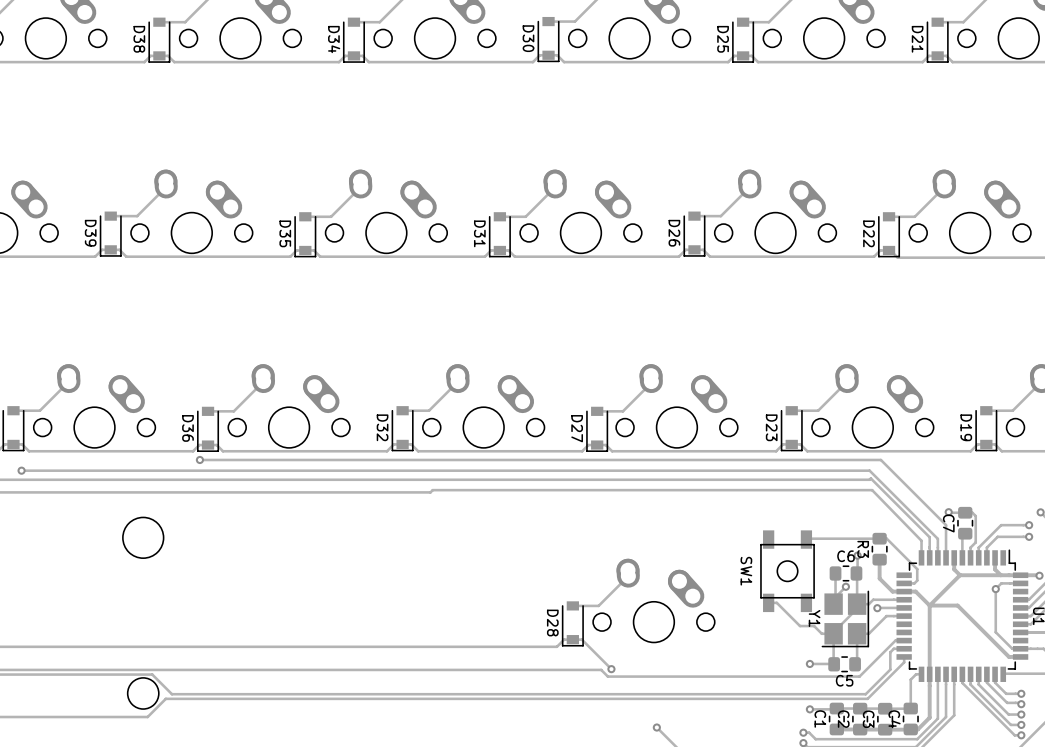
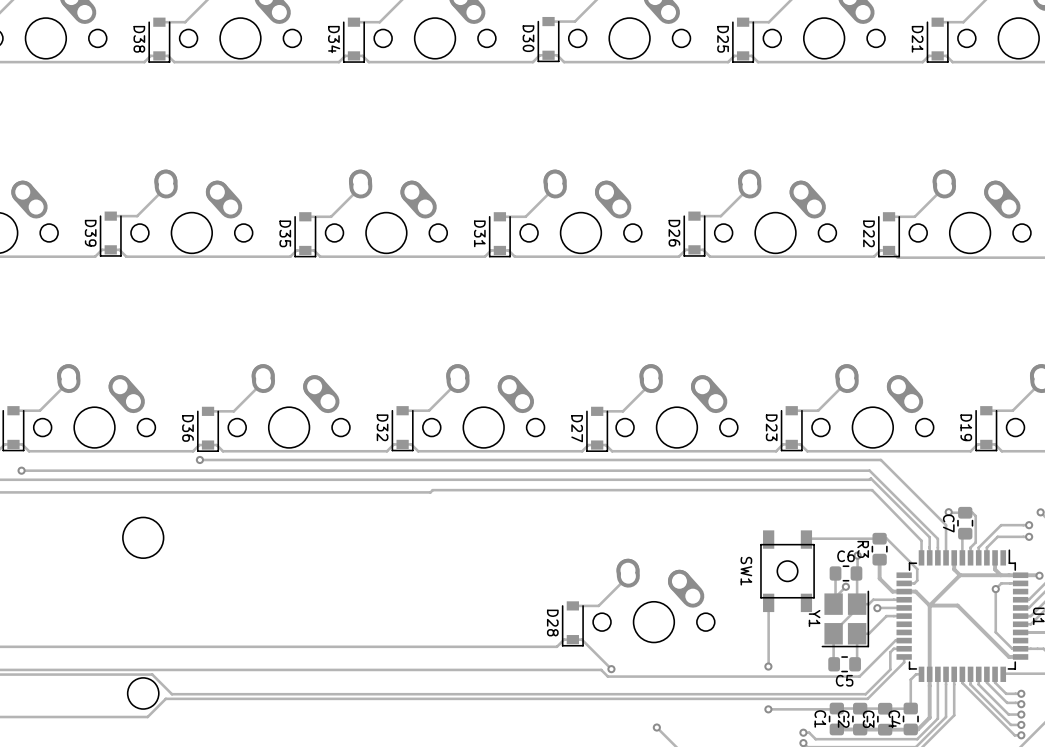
track: (768, 602) (776, 602) (800, 626) (814, 626) (821, 633) (833, 633) -> (768, 602) (768, 666)
via: (809, 663) -> none
track: (833, 663) (809, 663) -> none
via: none -> (768, 666)
via: none -> (768, 709)
track: none -> (809, 709) (768, 709)
via: (809, 709) -> none

